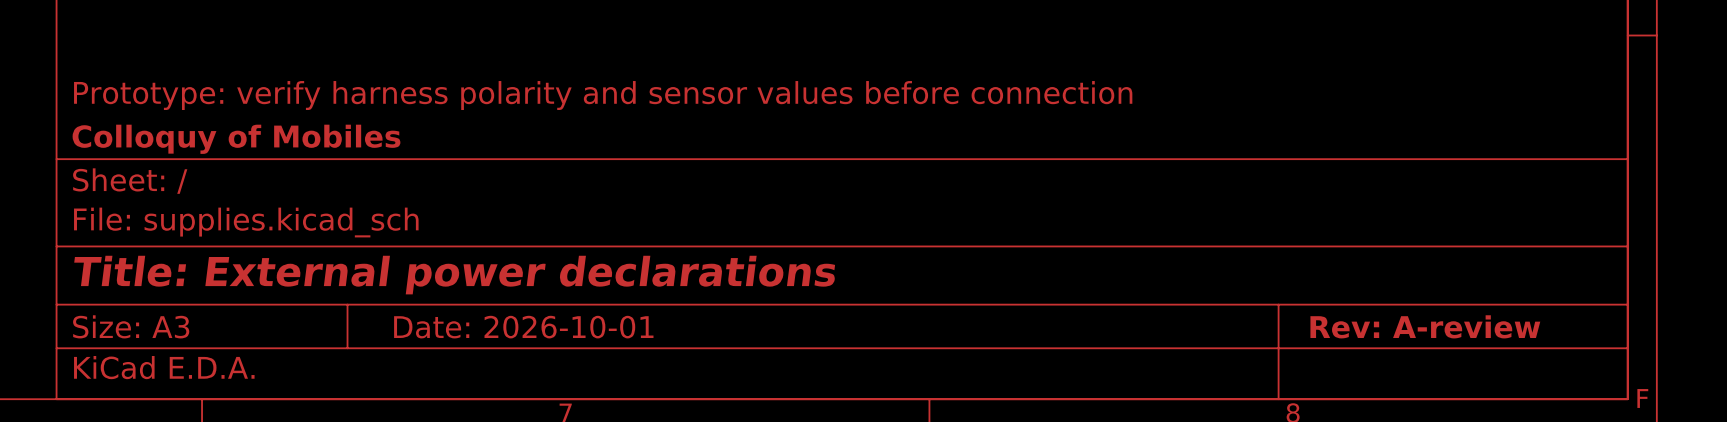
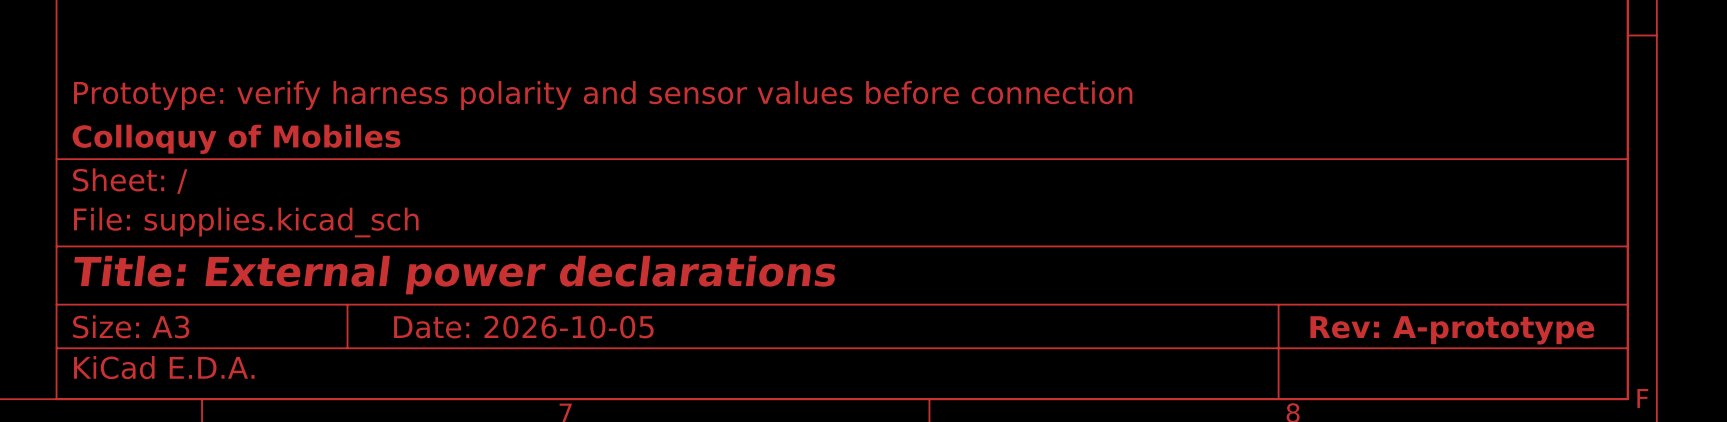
title block: Rev: A-review (1425, 326) -> Rev: A-prototype (1452, 330)
title block: Date: 2026-10-01 (523, 327) -> Date: 2026-10-05 (523, 327)

